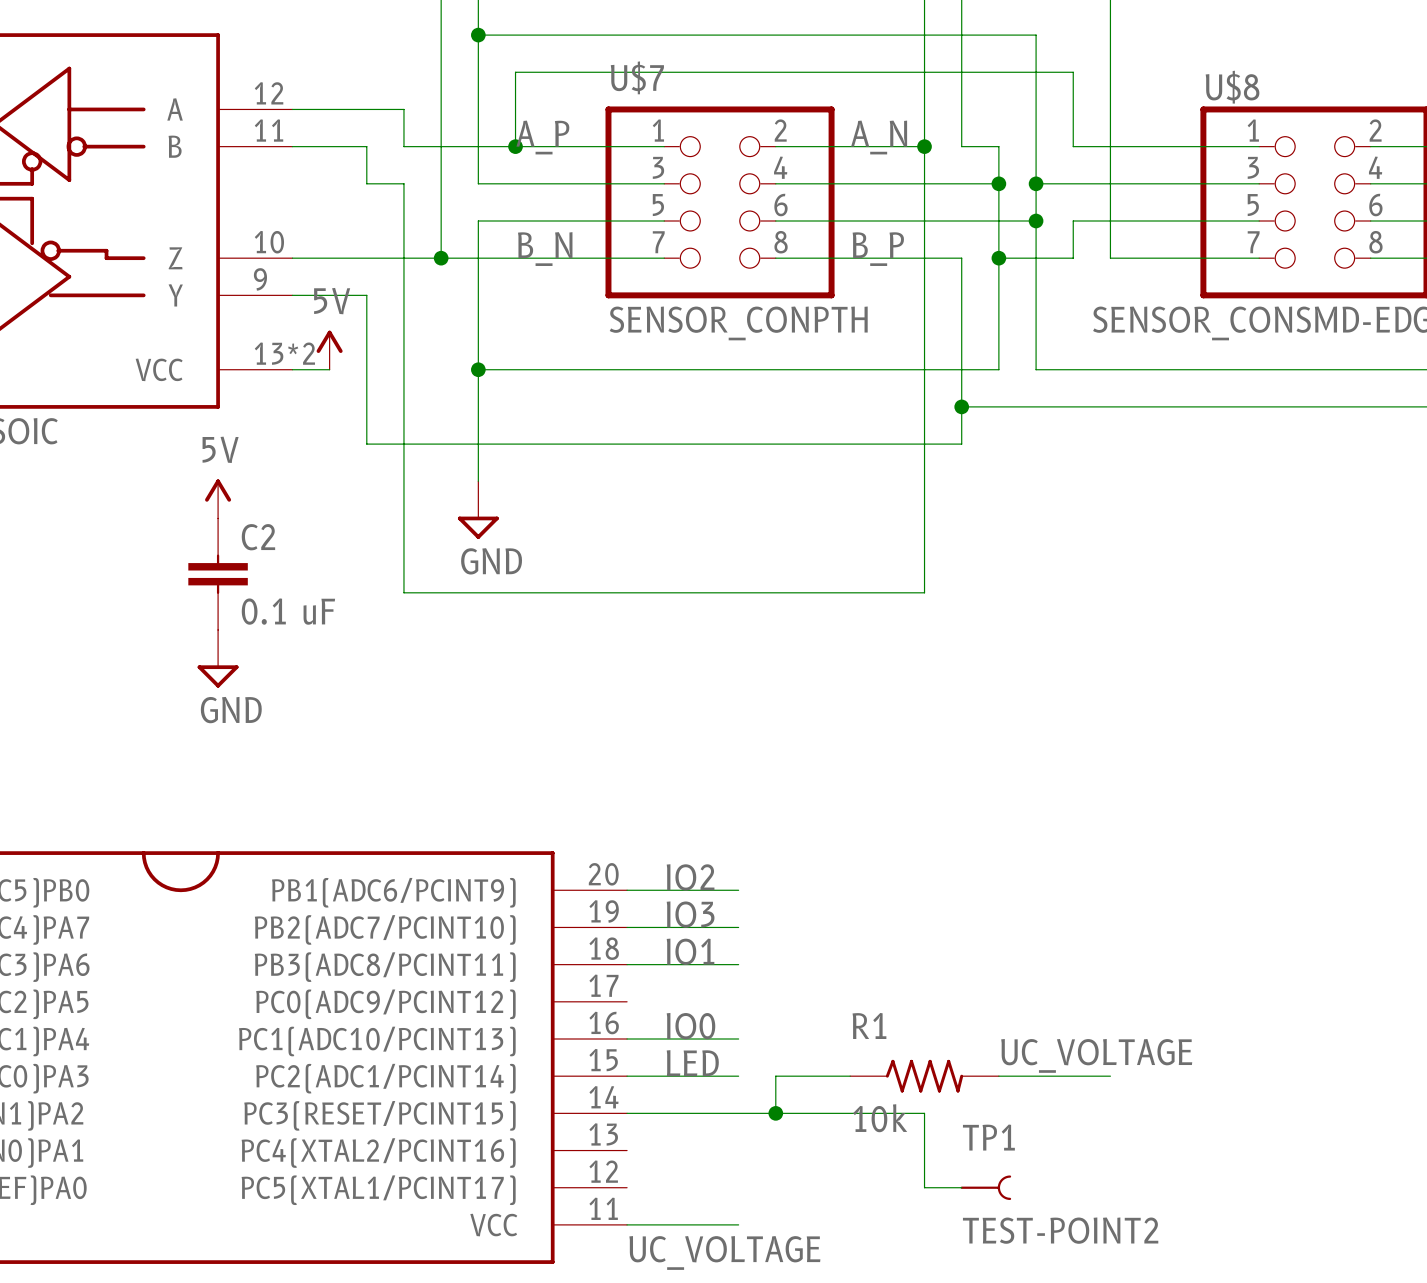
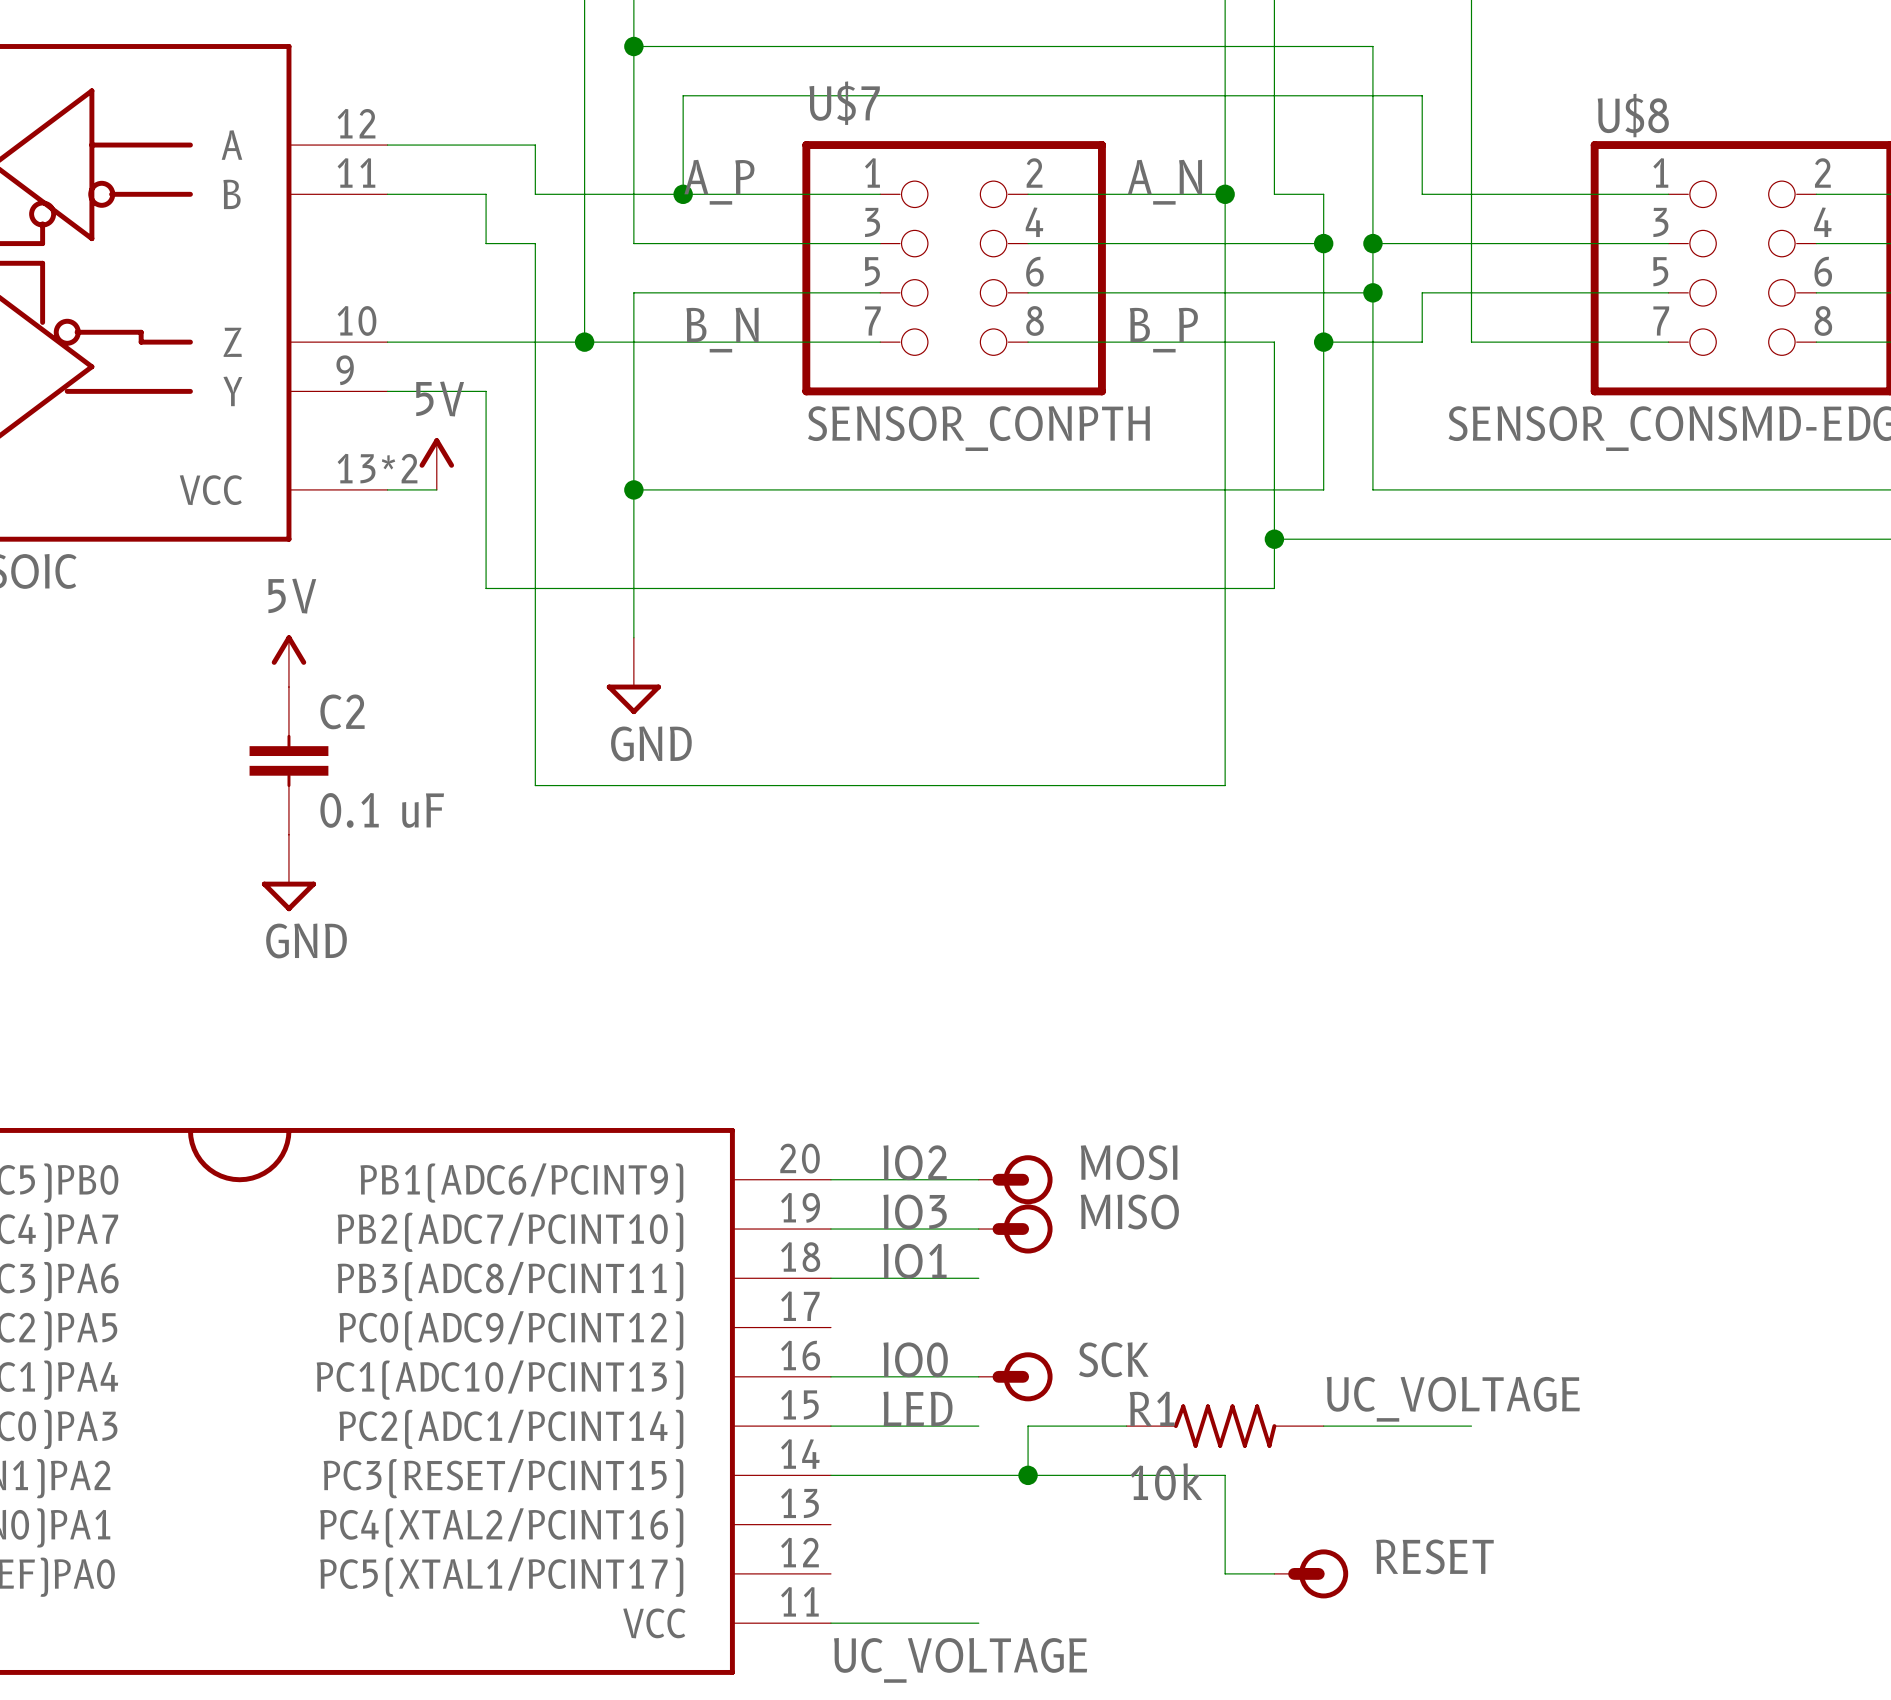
MOSI: none -> (1015, 1179)
MISO: none -> (1015, 1229)
R1 name position: R1 (869, 1025) -> R1 (1152, 1408)
SCK: none -> (1015, 1376)
TP1: TEST-POINT2 (985, 1187) -> none
RESET: none -> (1311, 1573)

